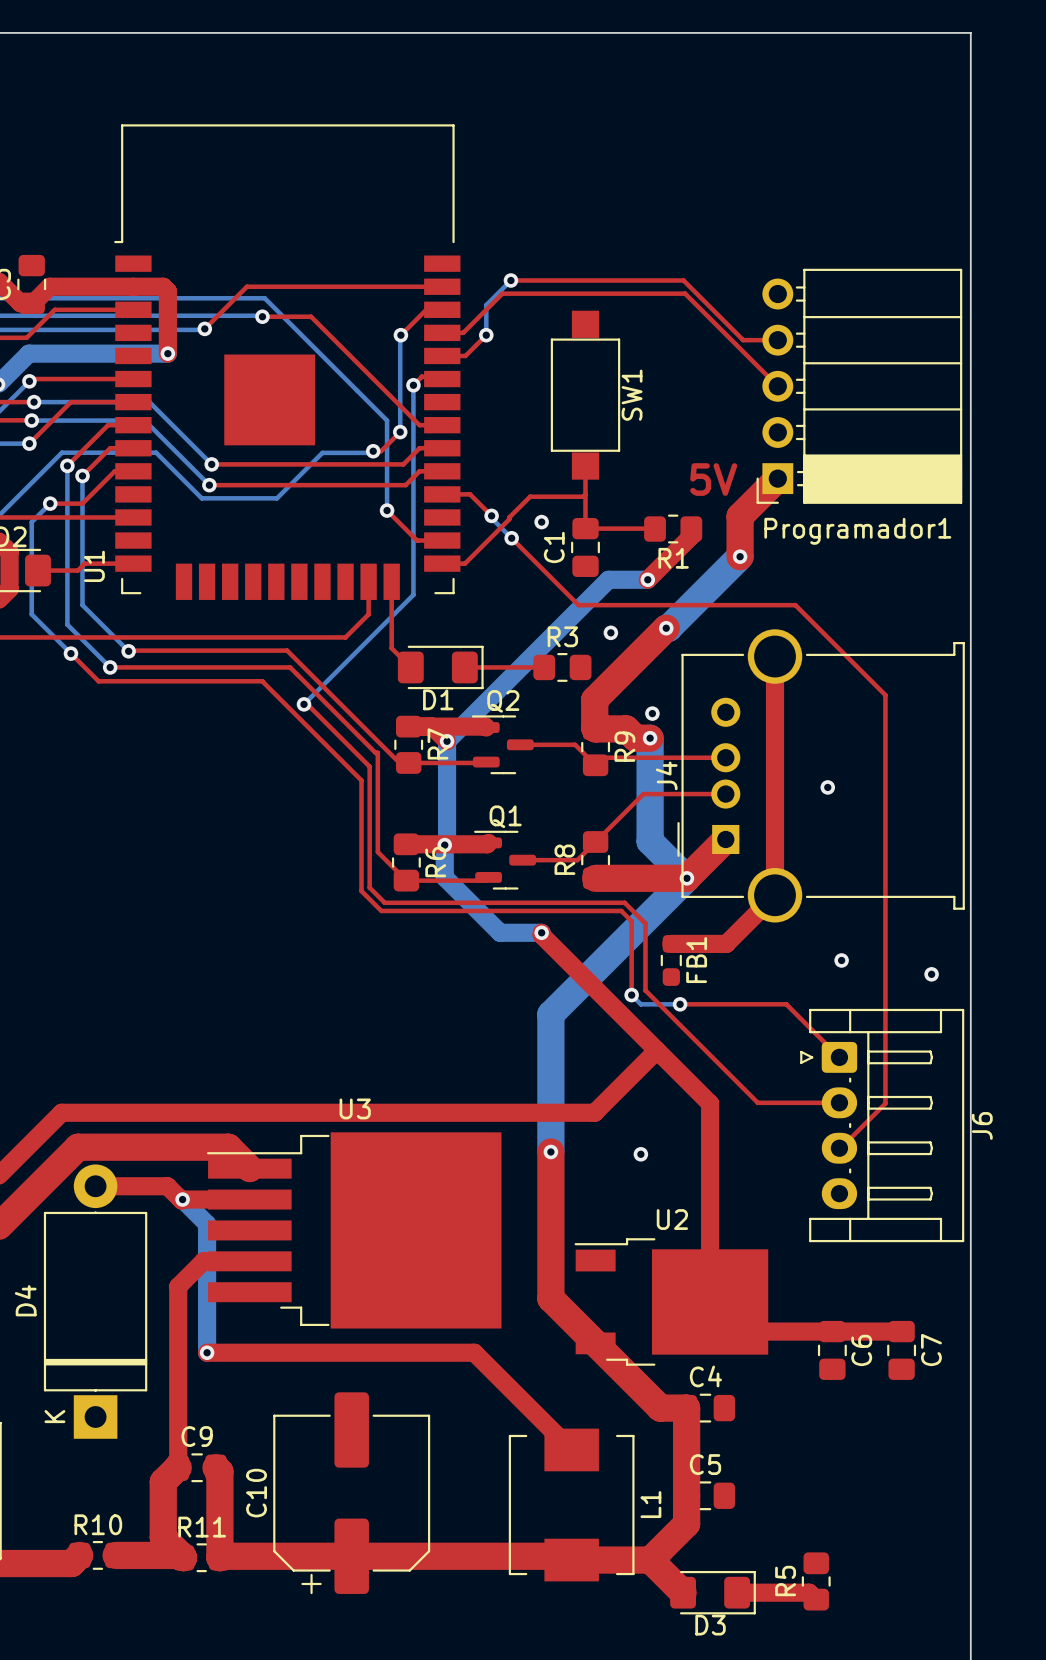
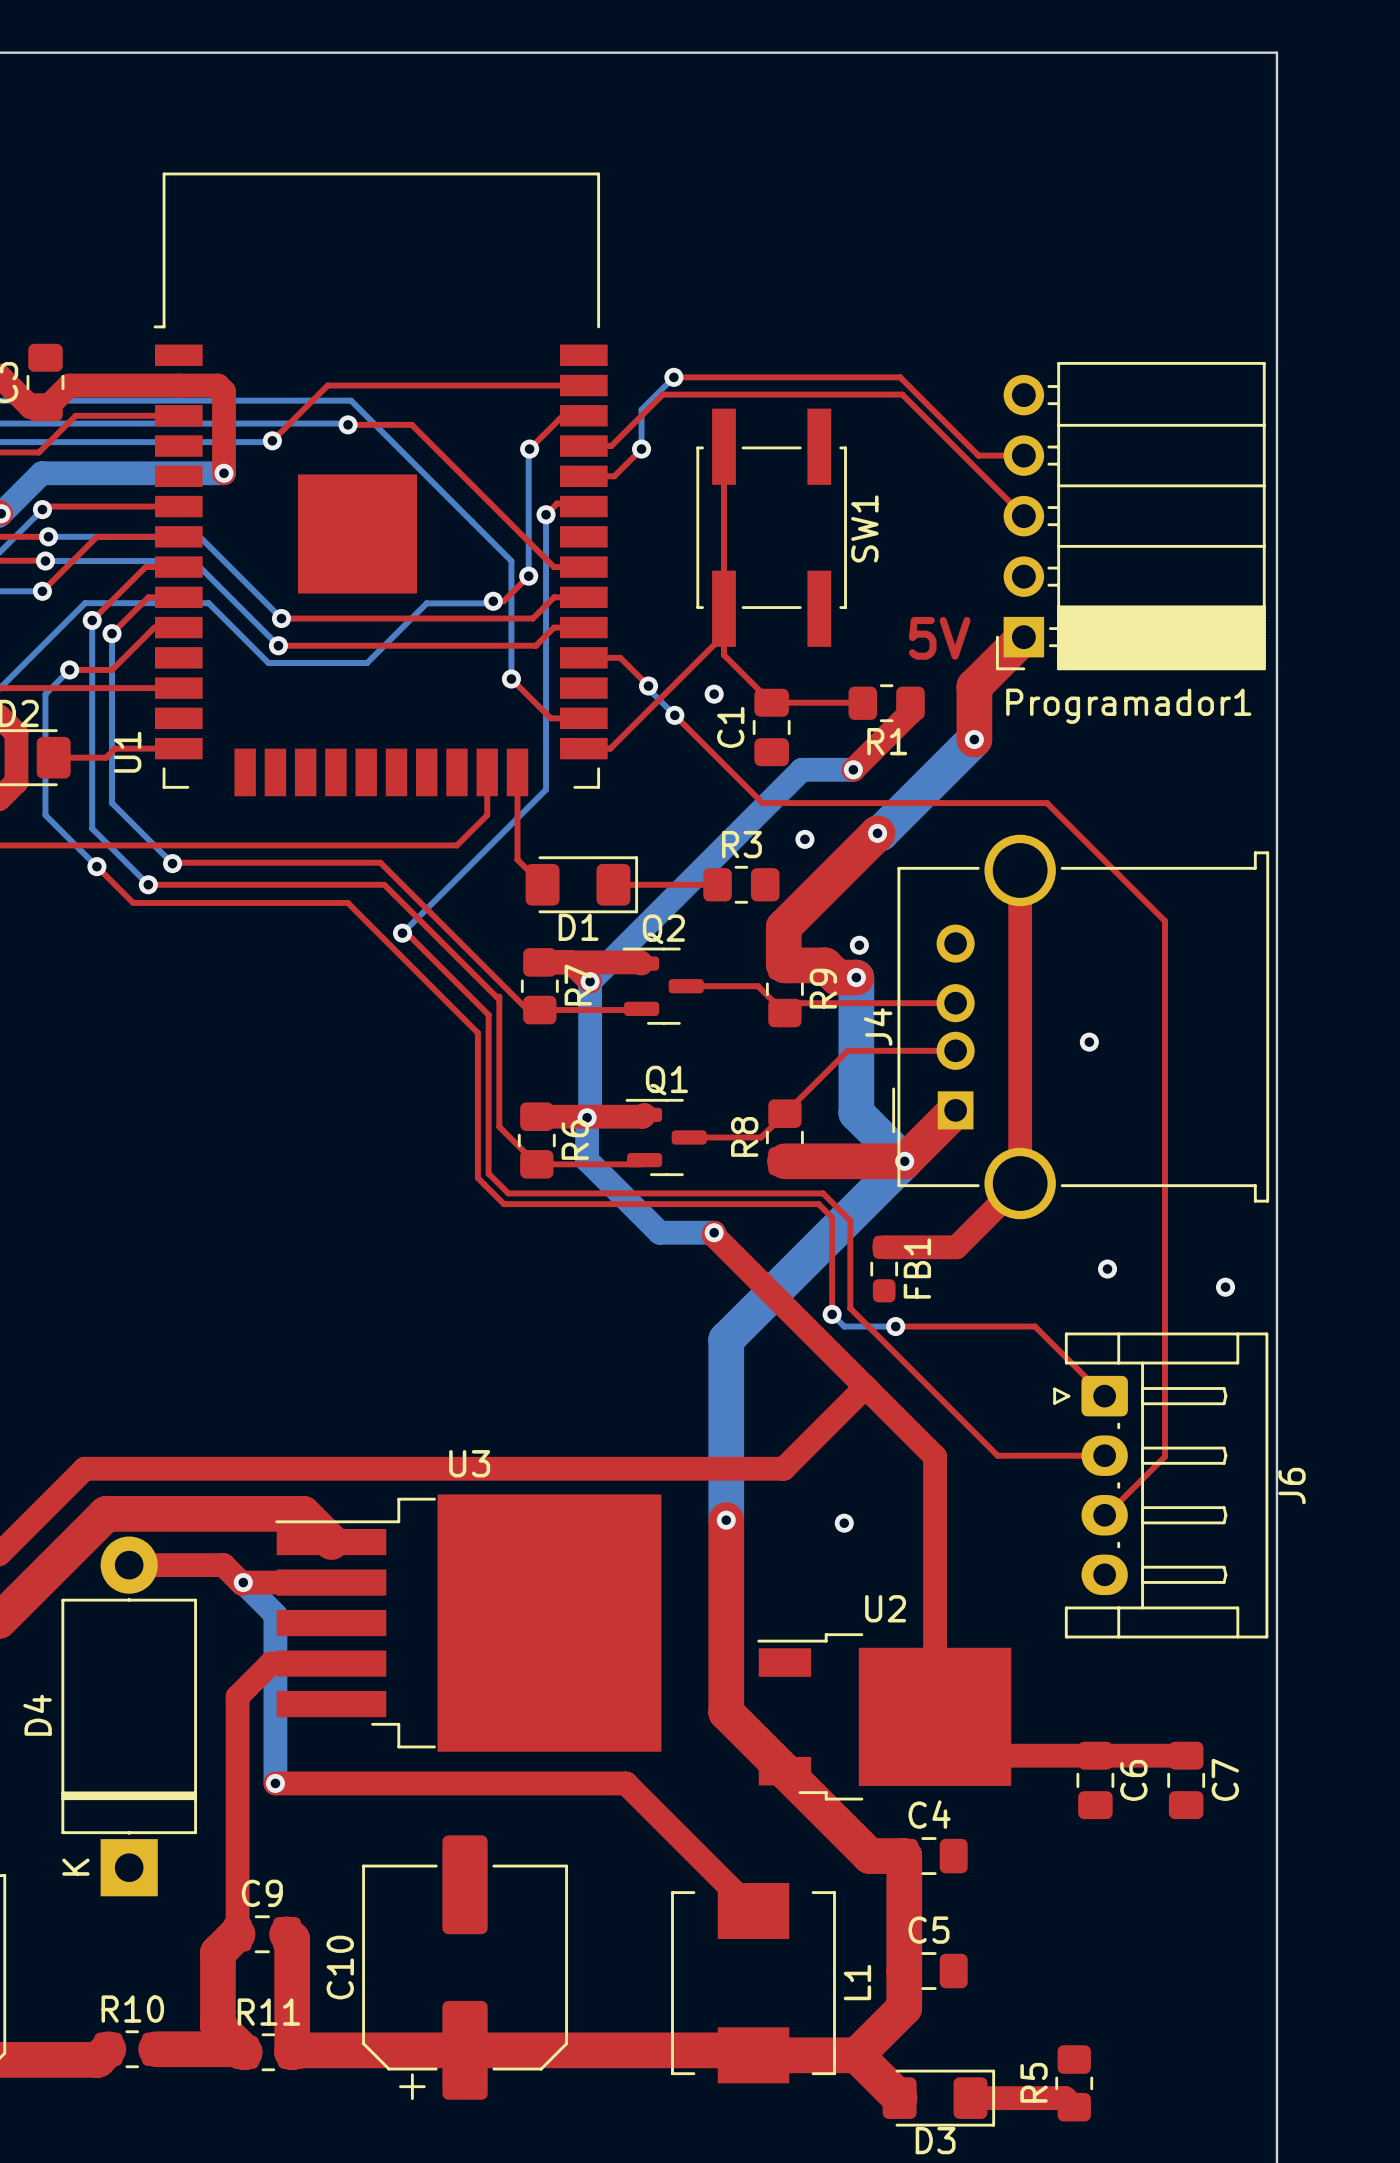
SW1 footprint: [550, 310, 621, 480] -> [696, 408, 847, 647]
top track: (585, 466) (585, 528) -> (724, 446) (724, 655) (771, 702)
top track: (585, 494) (583, 496) (530, 496) (464, 563) (462, 563) -> (724, 634) (610, 748)

